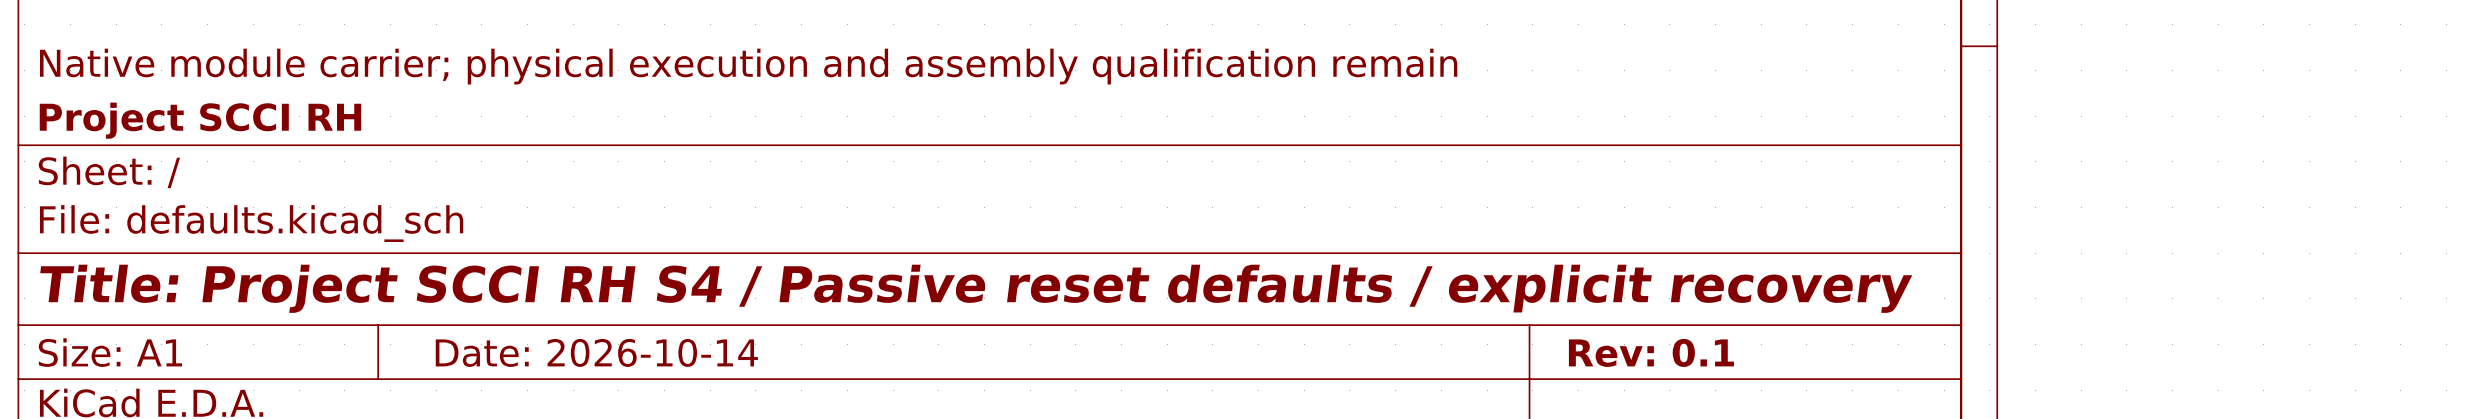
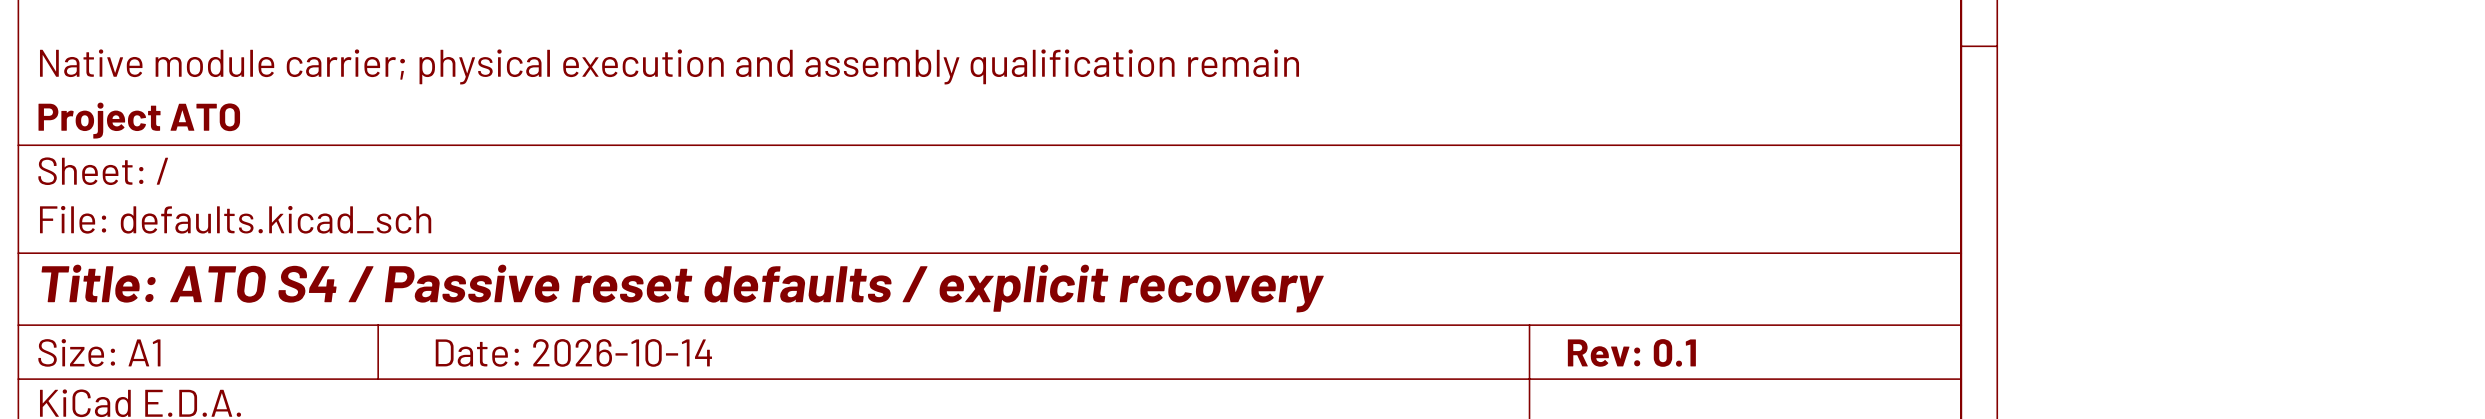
title block: Project SCCI RH (200, 120) -> Project ATO (139, 120)
title block: Title: Project SCCI RH S4 / Passive reset defaults / explicit recovery (976, 288) -> Title: ATO S4 / Passive reset defaults / explicit recovery (682, 288)

